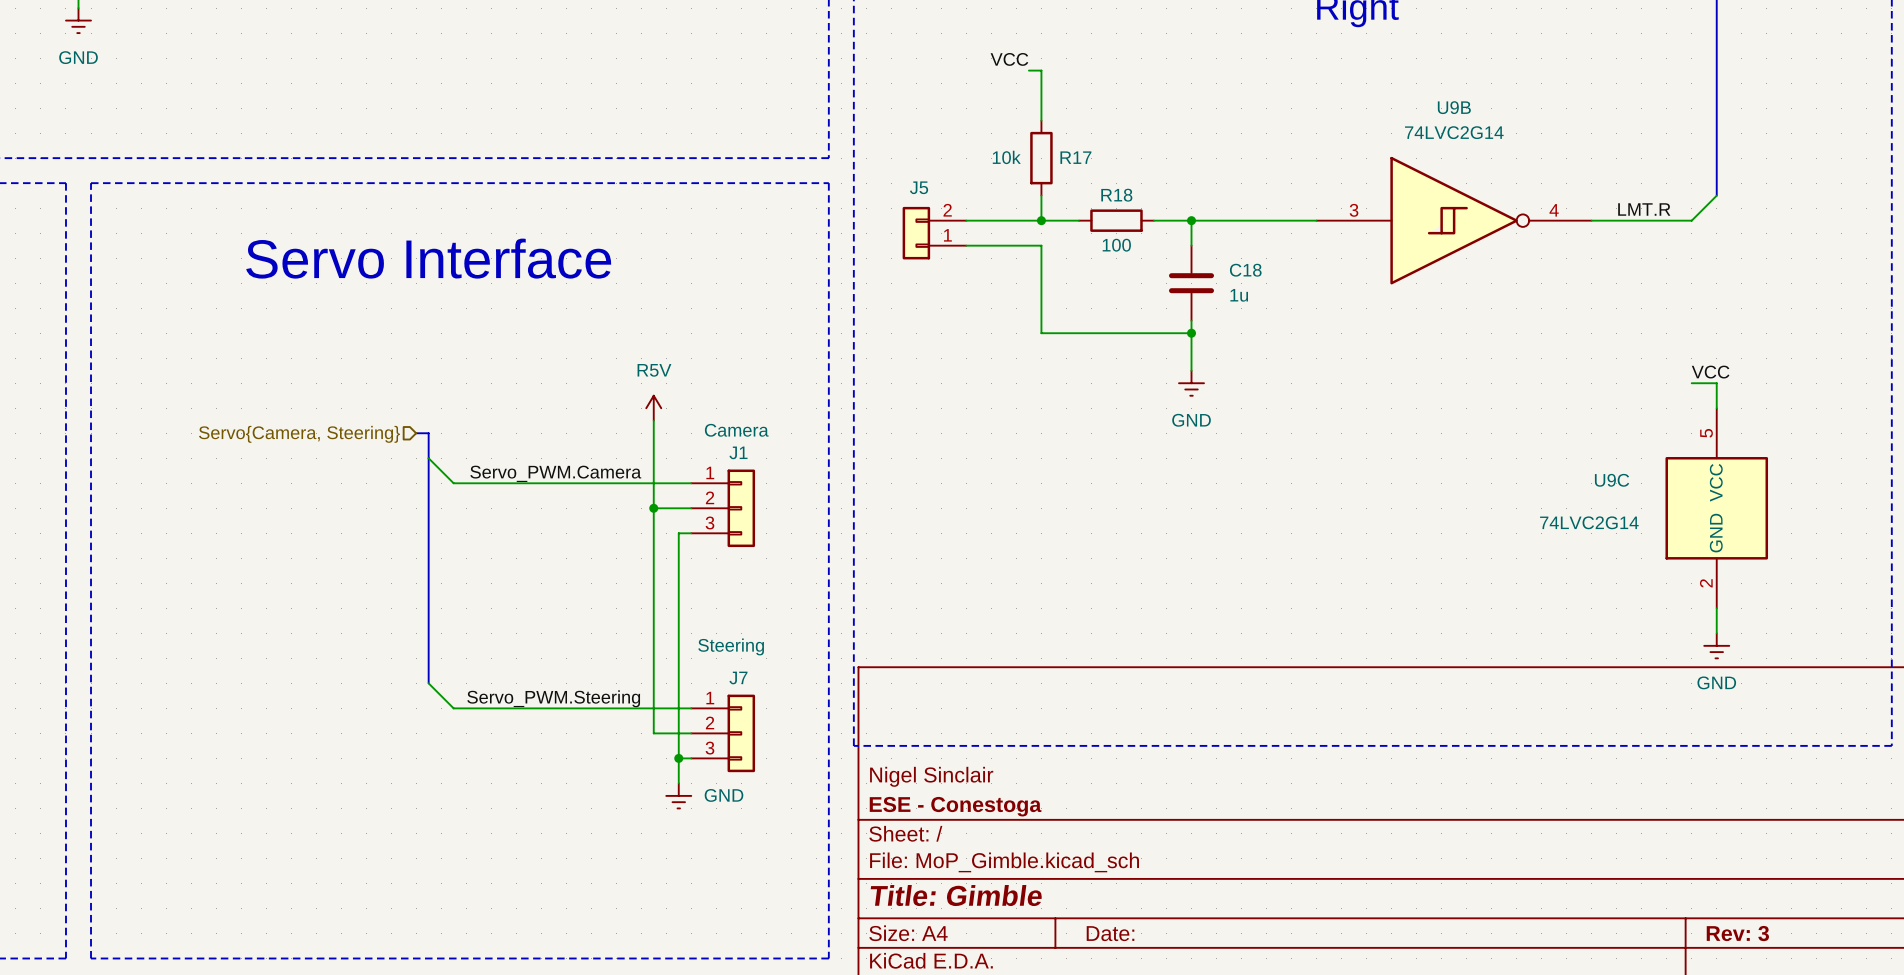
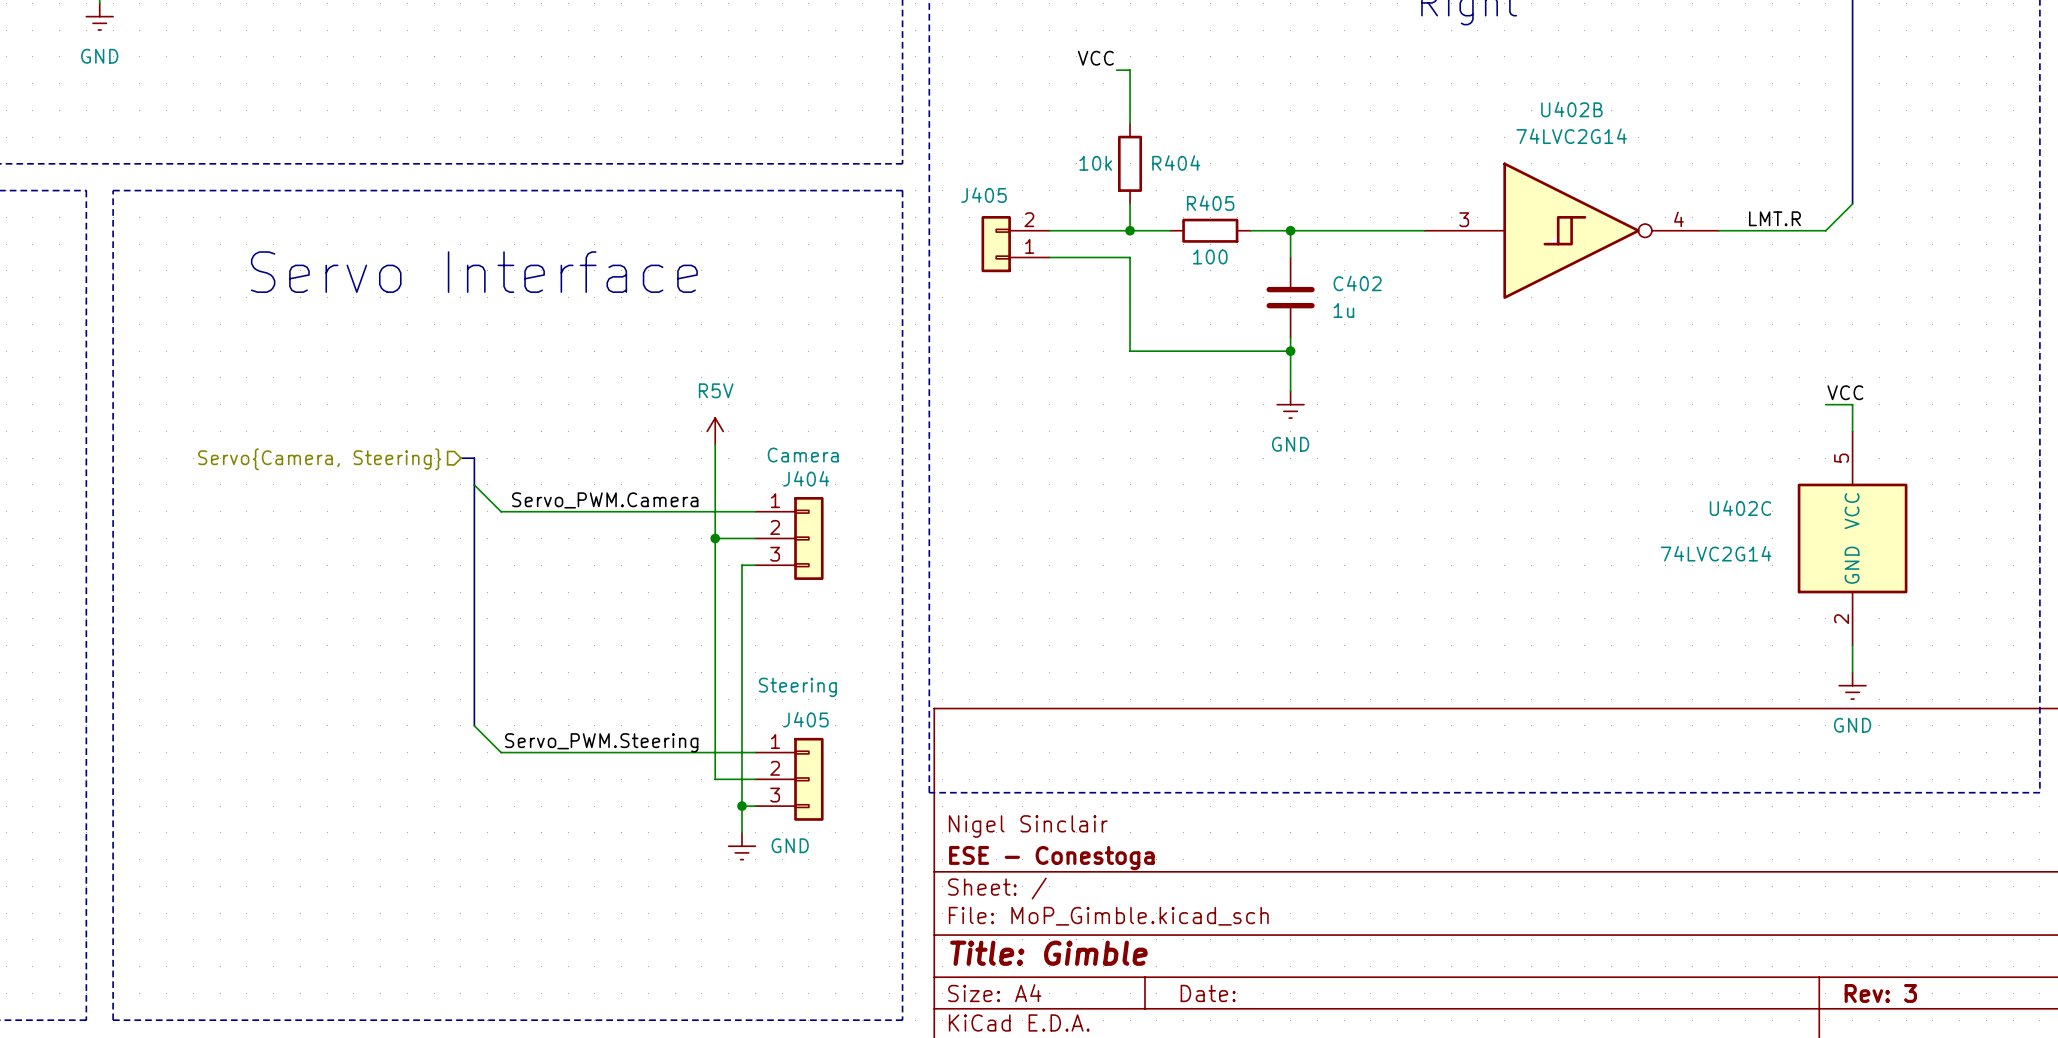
U9B name: U9B (1454, 107) -> U402B (1571, 109)
R17 name: R17 (1075, 157) -> R404 (1176, 163)
J5 name: J5 (919, 187) -> J405 (984, 195)
R18 name: R18 (1116, 195) -> R405 (1210, 203)
C18 name: C18 (1245, 270) -> C402 (1357, 283)
J1 name: J1 (738, 452) -> J404 (806, 478)
U9C name: U9C (1612, 480) -> U402C (1740, 508)
J7 name: J7 (738, 677) -> J405 (805, 719)

